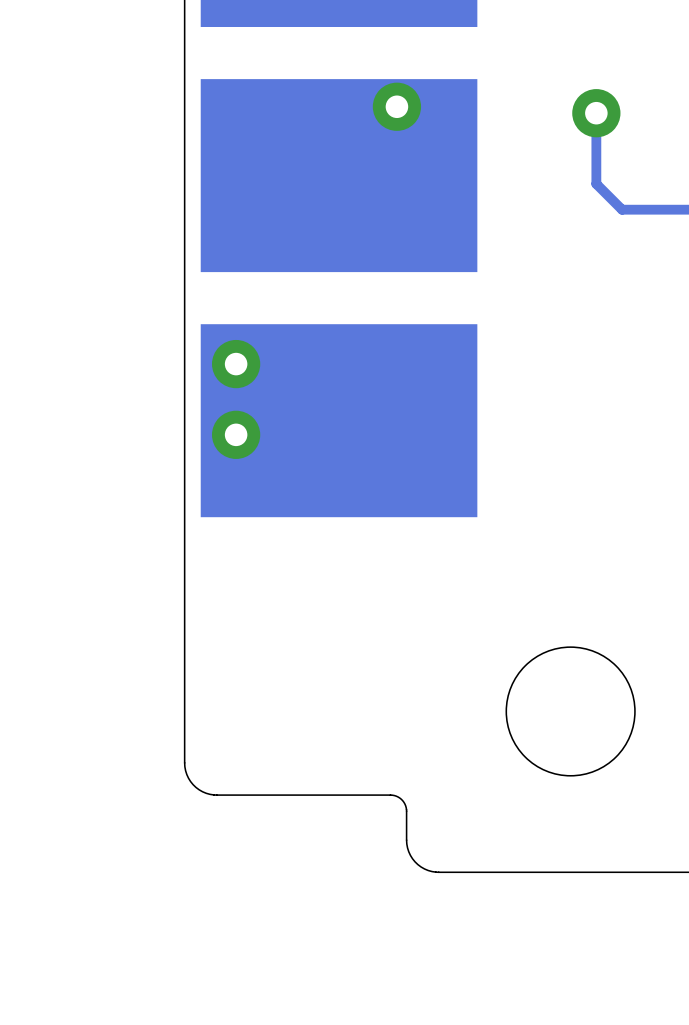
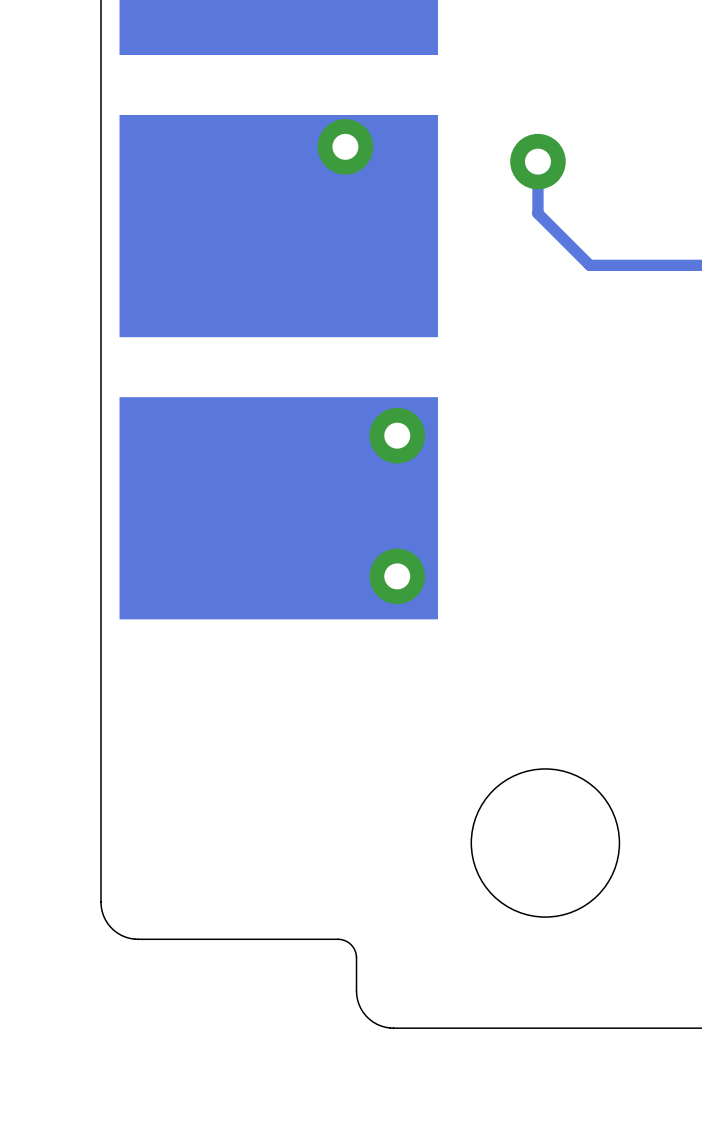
track: (596, 113) (596, 183) (622, 209) -> (537, 161) (537, 213) (589, 265) (604, 265)
via position: (596, 113) -> (537, 161)
via: none -> (397, 435)
via: (236, 364) -> none
via: (236, 434) -> none
via: none -> (397, 576)

